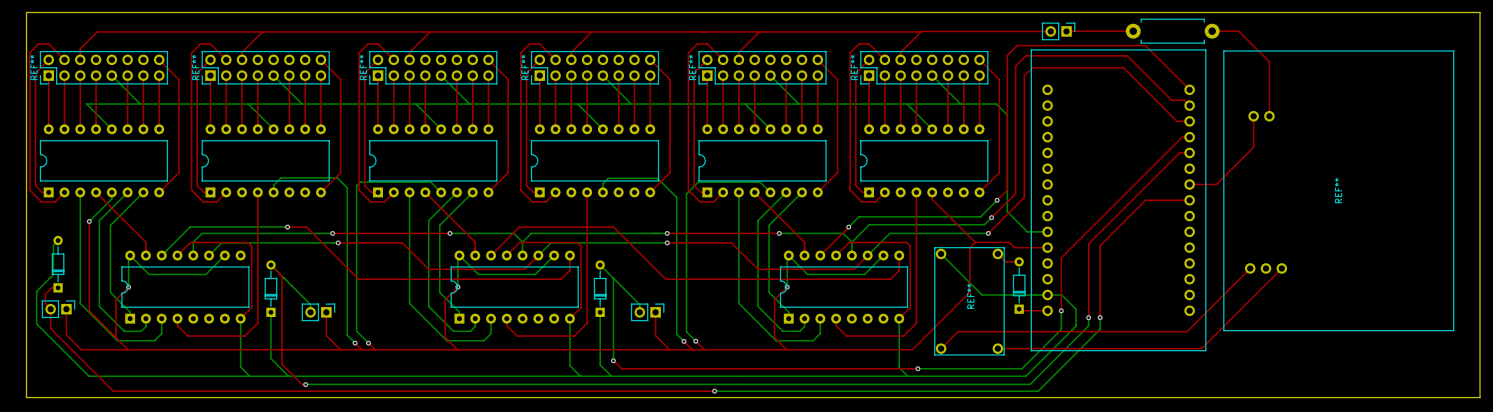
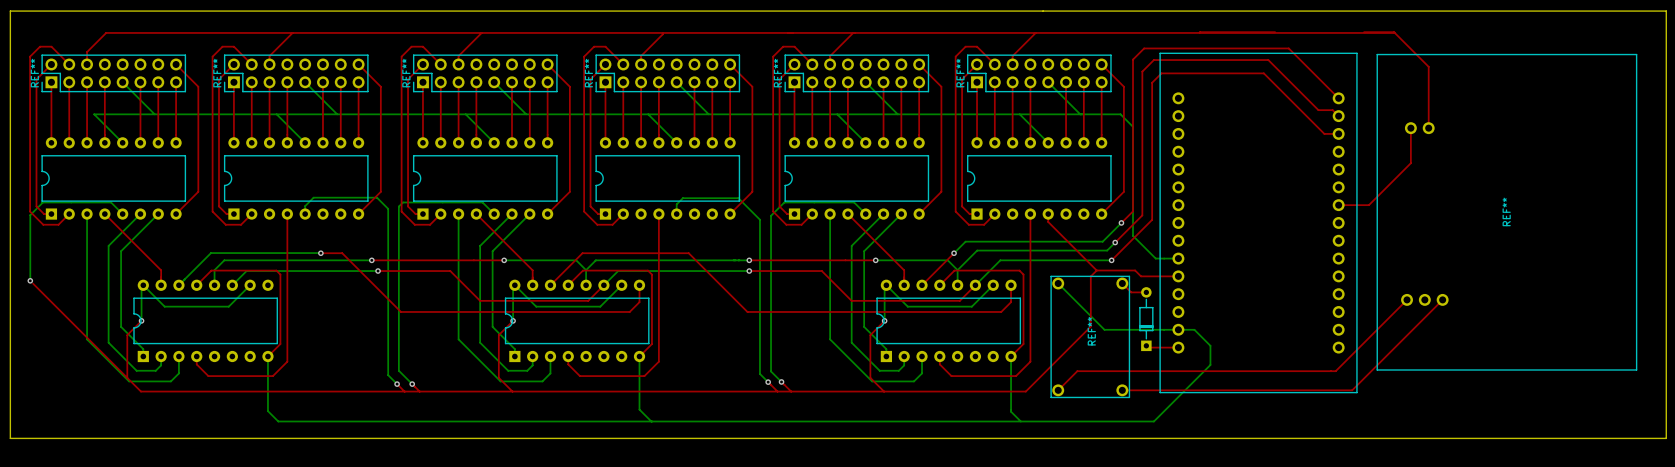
board edge: (26, 12) (26, 397) (1480, 397) (1480, 391) -> (26, 11) (10, 11) (10, 438) (1666, 438)
top track: (1050, 31) (921, 31) -> (1394, 32) (1035, 32)
part: (1058, 31) -> none
part: (1172, 31) -> none
top track: (1189, 137) (1182, 137) (1095, 224) -> none
top track: (1189, 152) (1179, 152) (1103, 229) -> none
bottom track: (111, 192) (111, 198) (89, 221) -> (122, 214) (111, 202) (42, 202) (30, 215) (30, 280)
top track: (1189, 200) (1145, 200) (1100, 245) (1100, 317) -> none
top track: (89, 221) (89, 311) -> (33, 283) (97, 347)
via: (89, 221) -> none
top track: (1095, 224) (1061, 257) (1061, 310) -> none
top track: (1102, 229) (1088, 243) (1088, 317) -> none
bottom track: (58, 240) (53, 245) (53, 274) (36, 291) (36, 323) (88, 376) (249, 376) -> none
via: none -> (30, 280)
part: (58, 264) -> none
top track: (270, 265) (282, 276) (282, 364) (302, 384) (305, 384) -> none
bottom track: (270, 265) (310, 304) (310, 312) -> none
bottom track: (600, 265) (639, 304) (639, 312) -> none
bottom track: (613, 278) (613, 360) -> none
top track: (58, 287) (51, 287) (45, 294) (45, 303) (50, 309) (50, 328) (113, 391) (714, 391) -> none
part: (270, 288) -> none
part: (600, 288) -> none
part: (58, 309) -> none
top track: (66, 309) (66, 334) (81, 349) (128, 349) -> none
bottom track: (1061, 310) (1061, 329) (1022, 368) (917, 368) -> none
via: (1061, 310) -> none
bottom track: (270, 312) (270, 358) (288, 376) -> none
part: (318, 312) -> none
top track: (326, 312) (326, 335) (340, 349) -> none
bottom track: (600, 312) (600, 364) (611, 376) -> none
part: (647, 312) -> none
top track: (655, 312) (655, 335) (669, 349) -> none
bottom track: (1088, 317) (1088, 325) (1030, 384) (305, 384) -> none
via: (1088, 317) -> none
bottom track: (1100, 317) (1100, 329) (1038, 391) (714, 391) -> none
via: (1100, 317) -> none
top track: (613, 360) (621, 368) (917, 368) -> none
via: (613, 360) -> none
via: (917, 368) -> none
via: (305, 384) -> none
via: (714, 391) -> none

